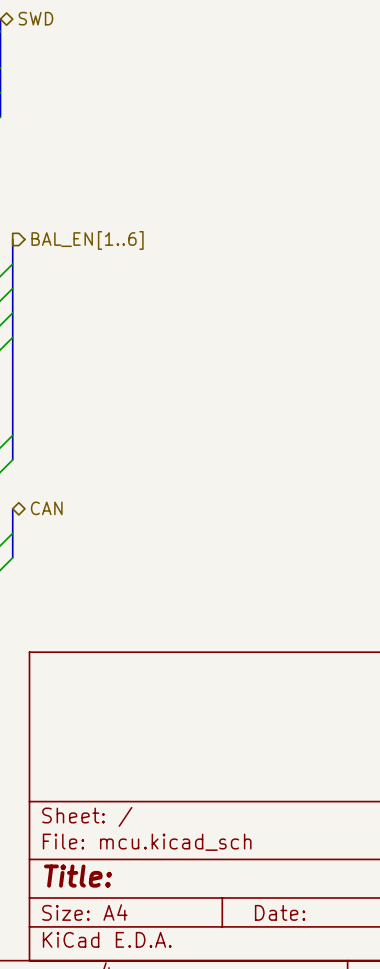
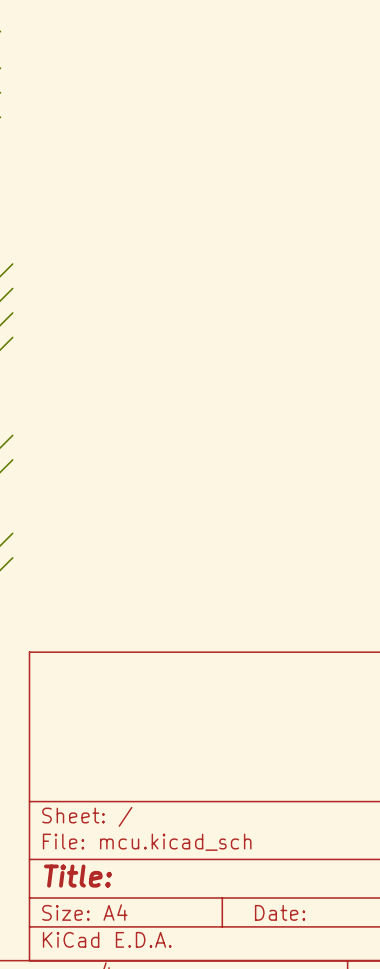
hierarchical label: SWD (35, 18) -> none
bus: (0, 19) (0, 117) -> none
bus: (12, 239) (12, 459) -> none
hierarchical label: BAL_EN[1..6] (87, 240) -> none
bus: (12, 508) (12, 557) -> none
hierarchical label: CAN (46, 508) -> none

